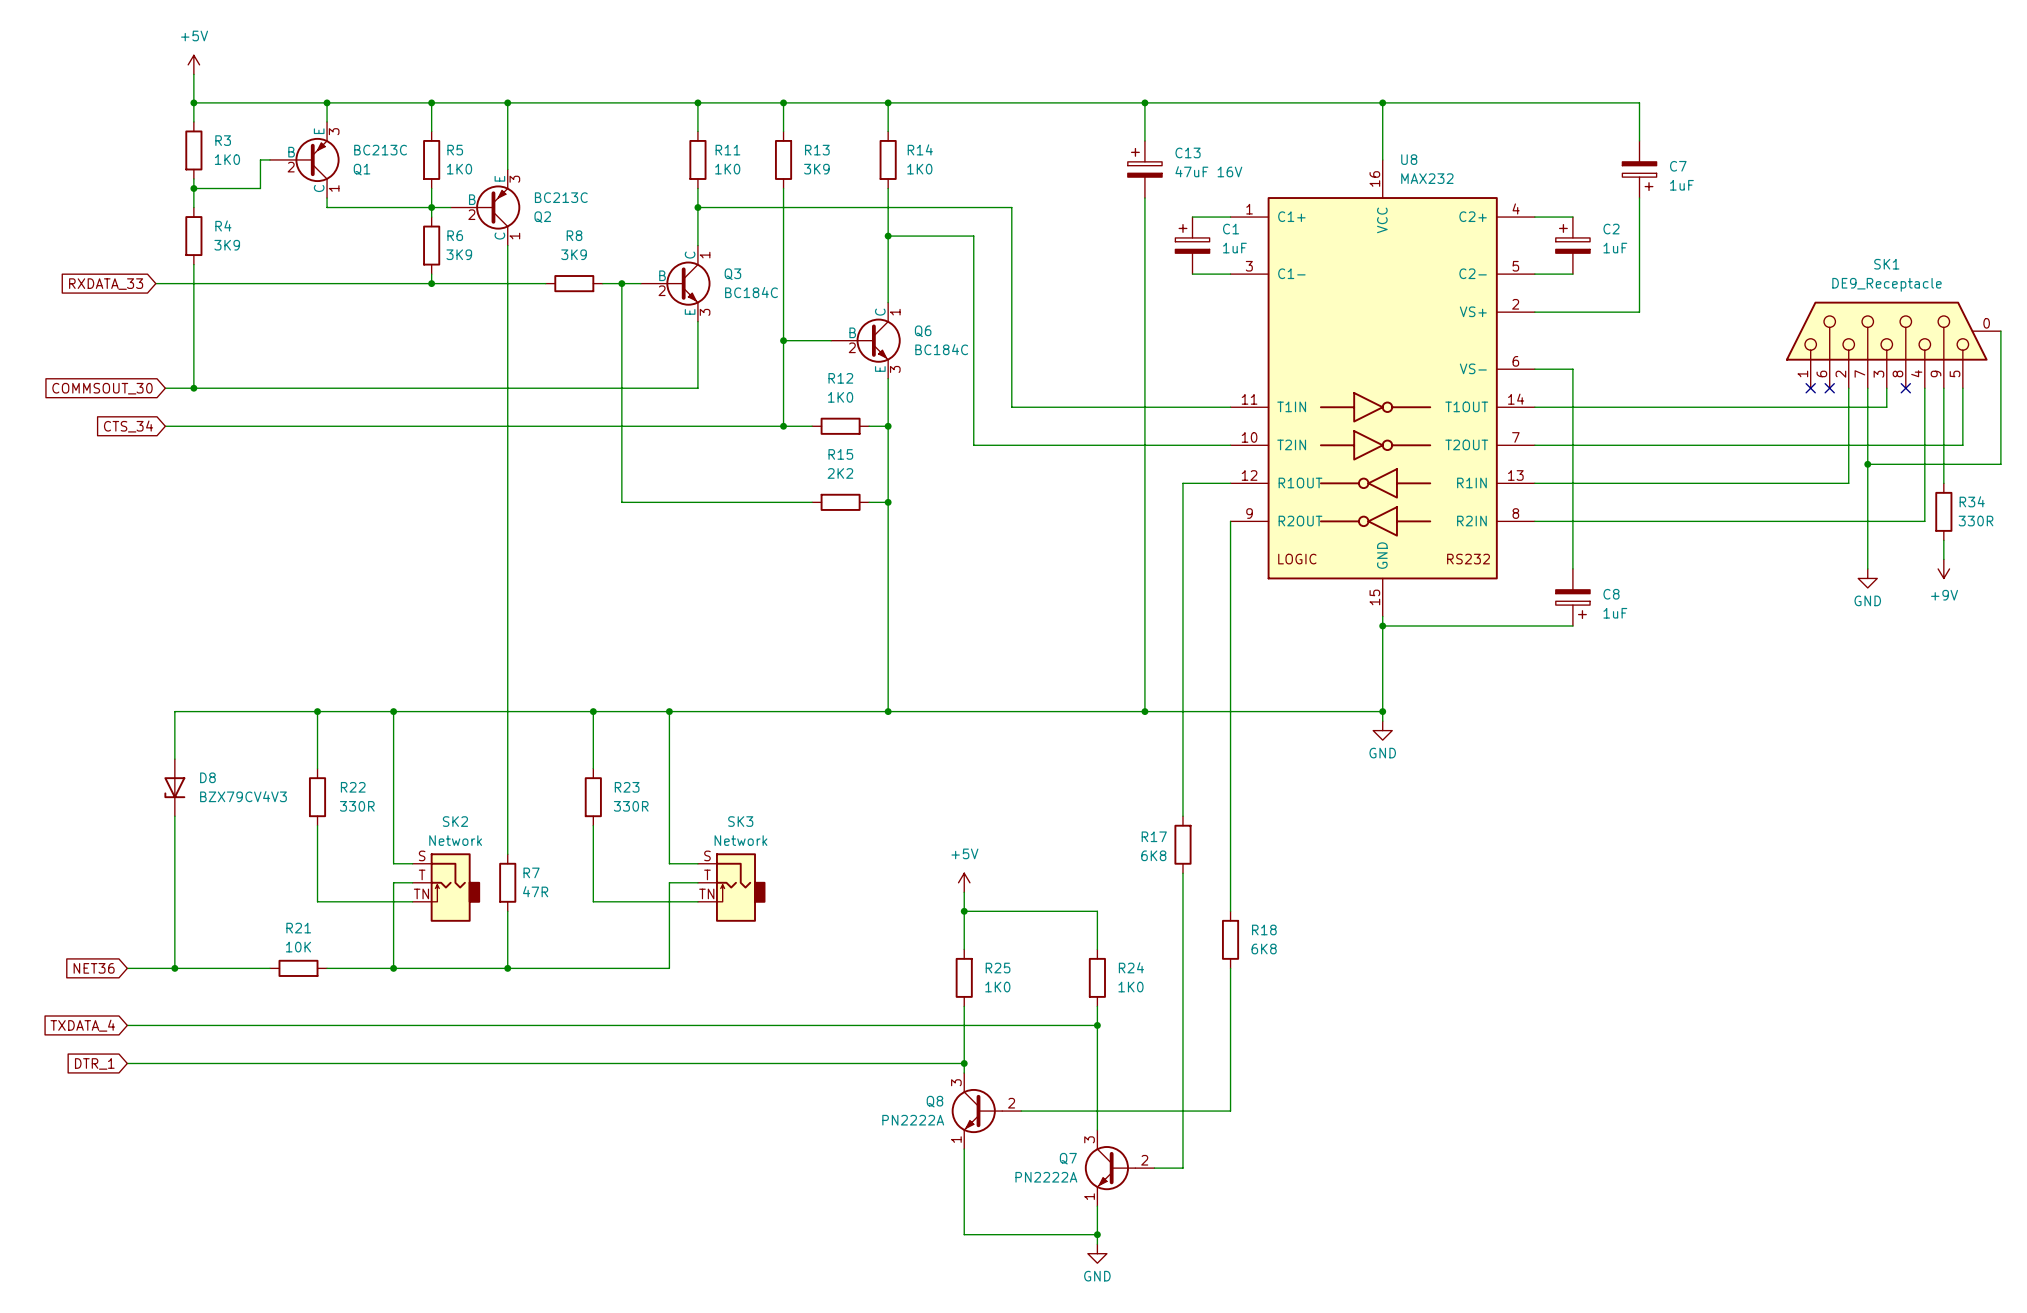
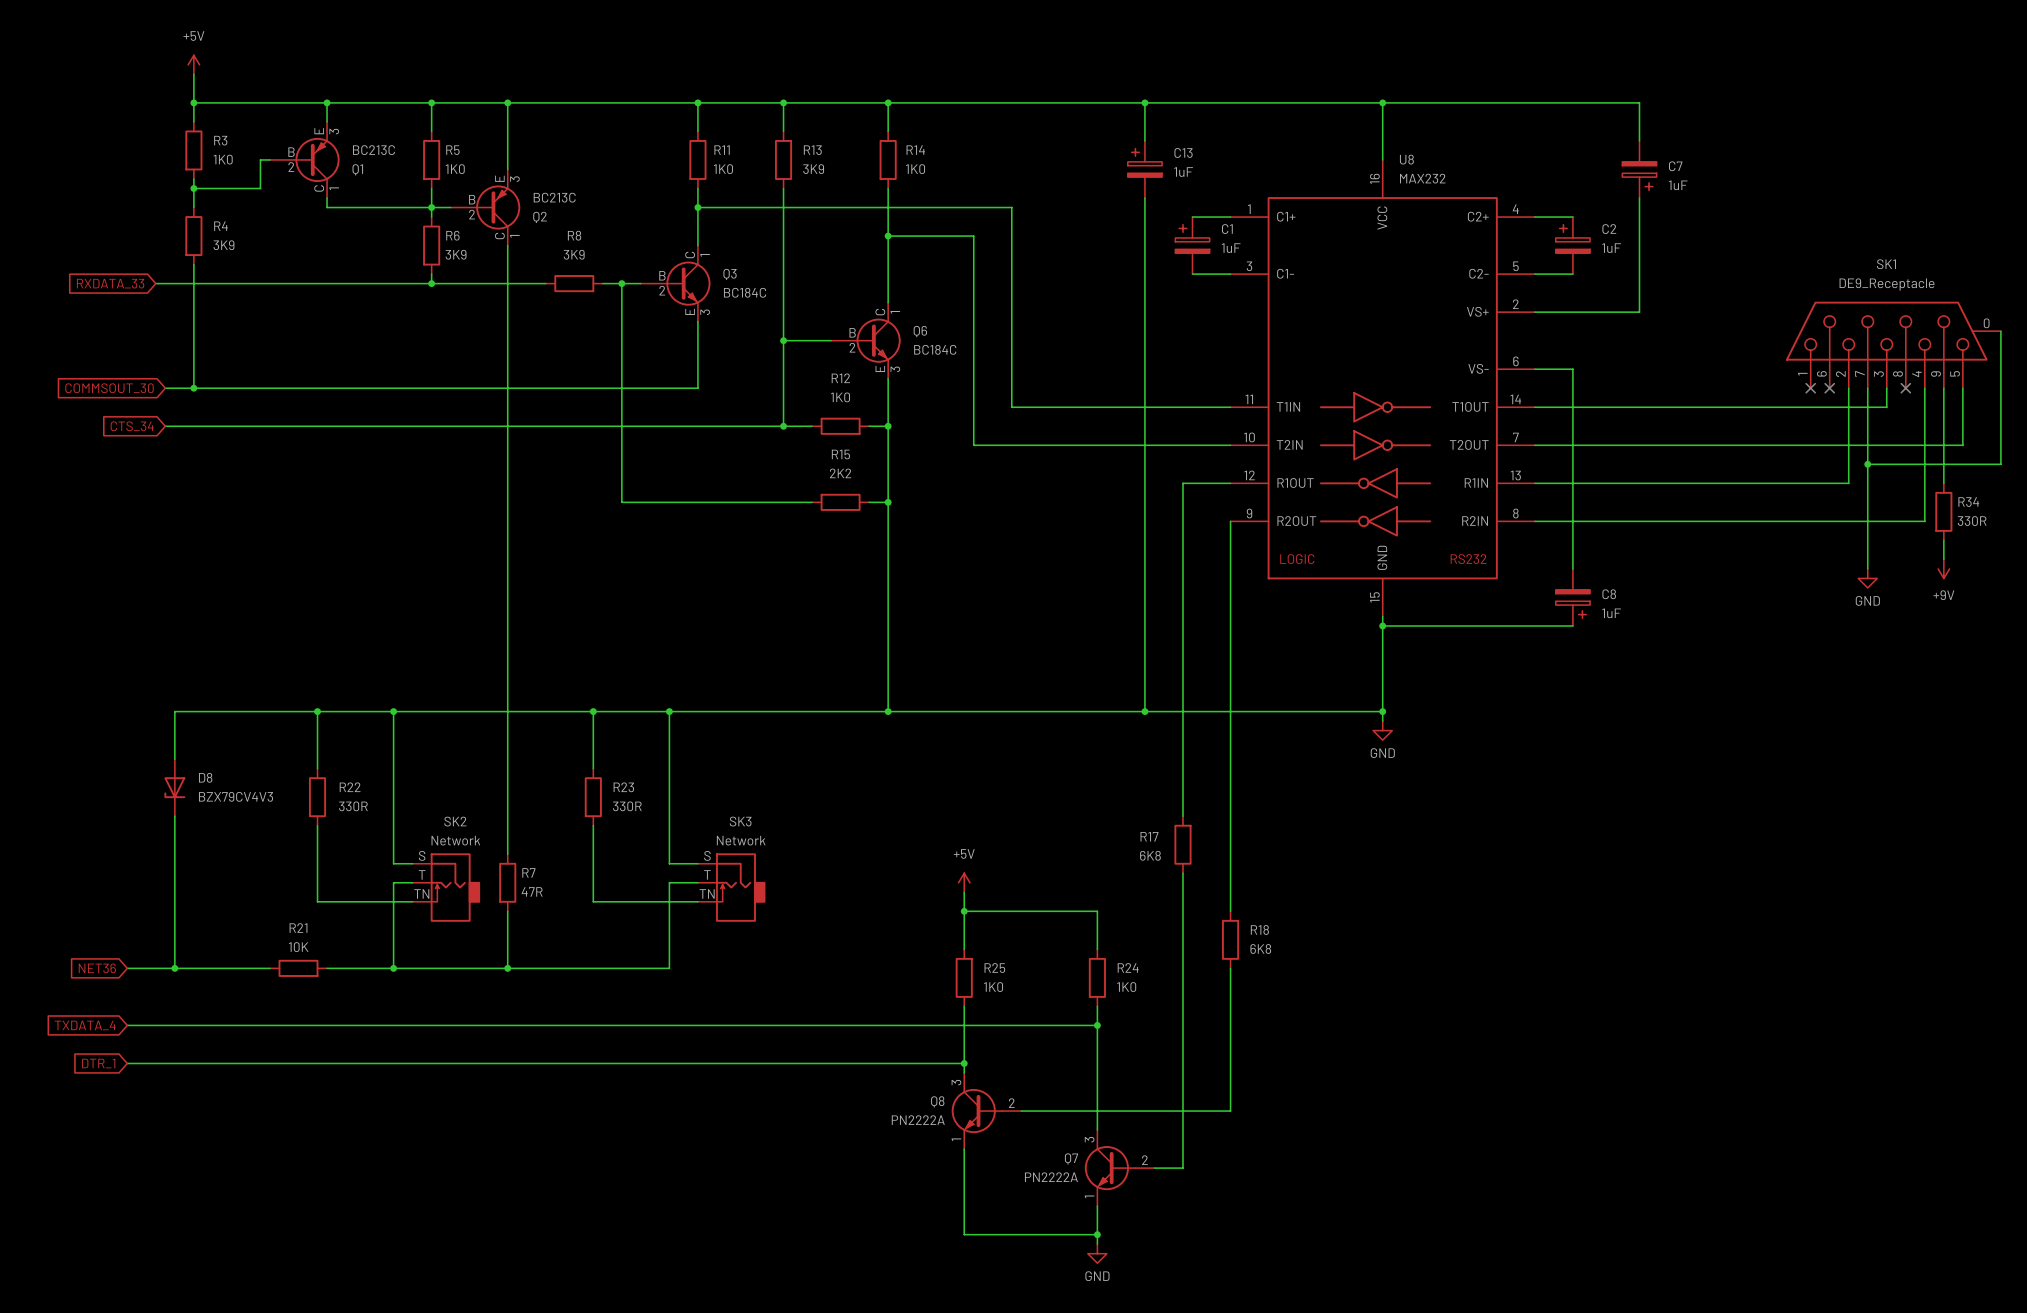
C13 value: 47uF 16V (1208, 171) -> 1uF (1183, 172)

